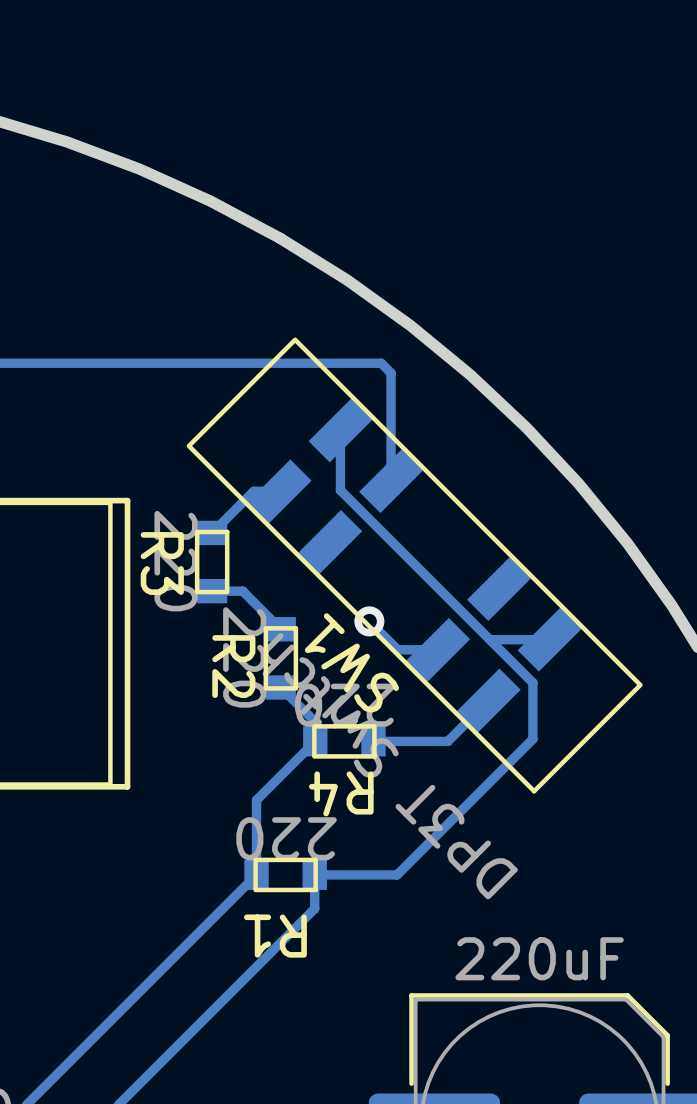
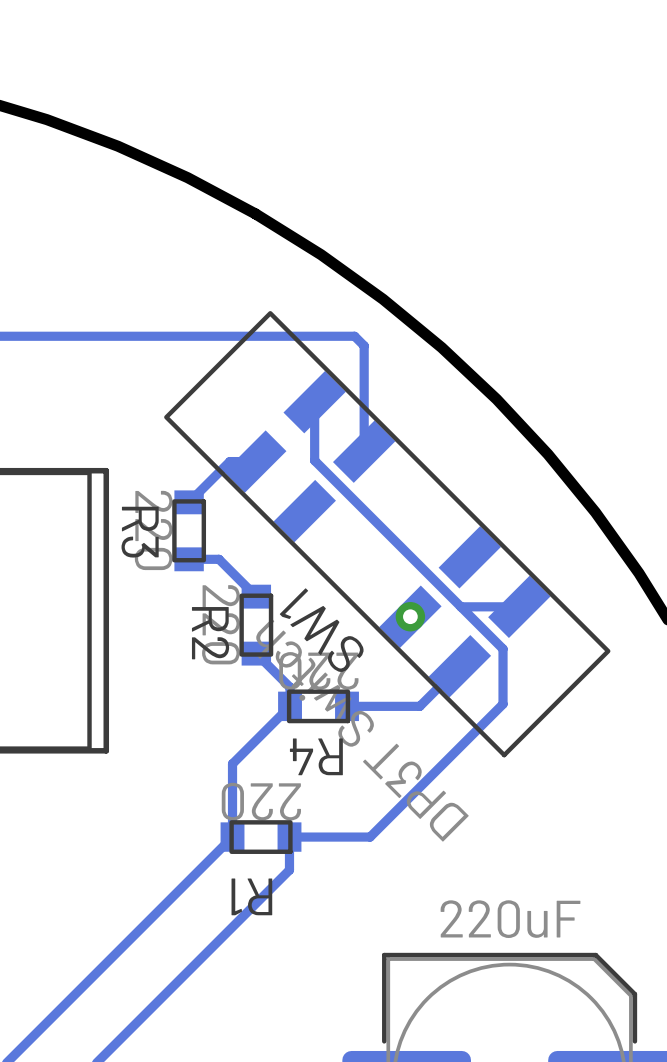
track: (369, 621) (397, 649) (438, 649) -> none
via: (369, 621) -> none
via: none -> (410, 616)

